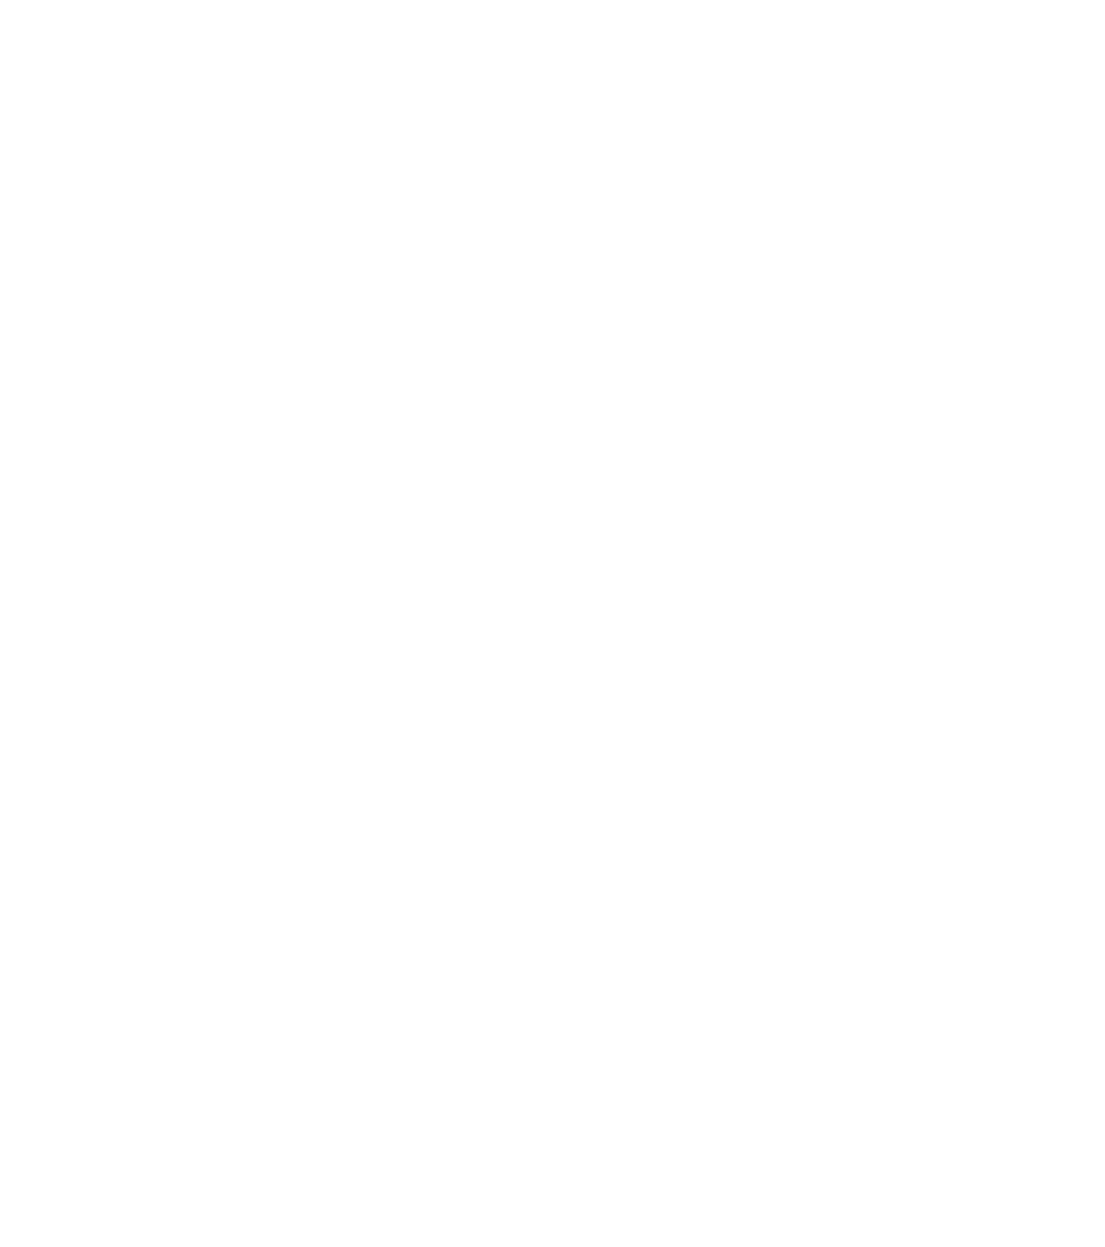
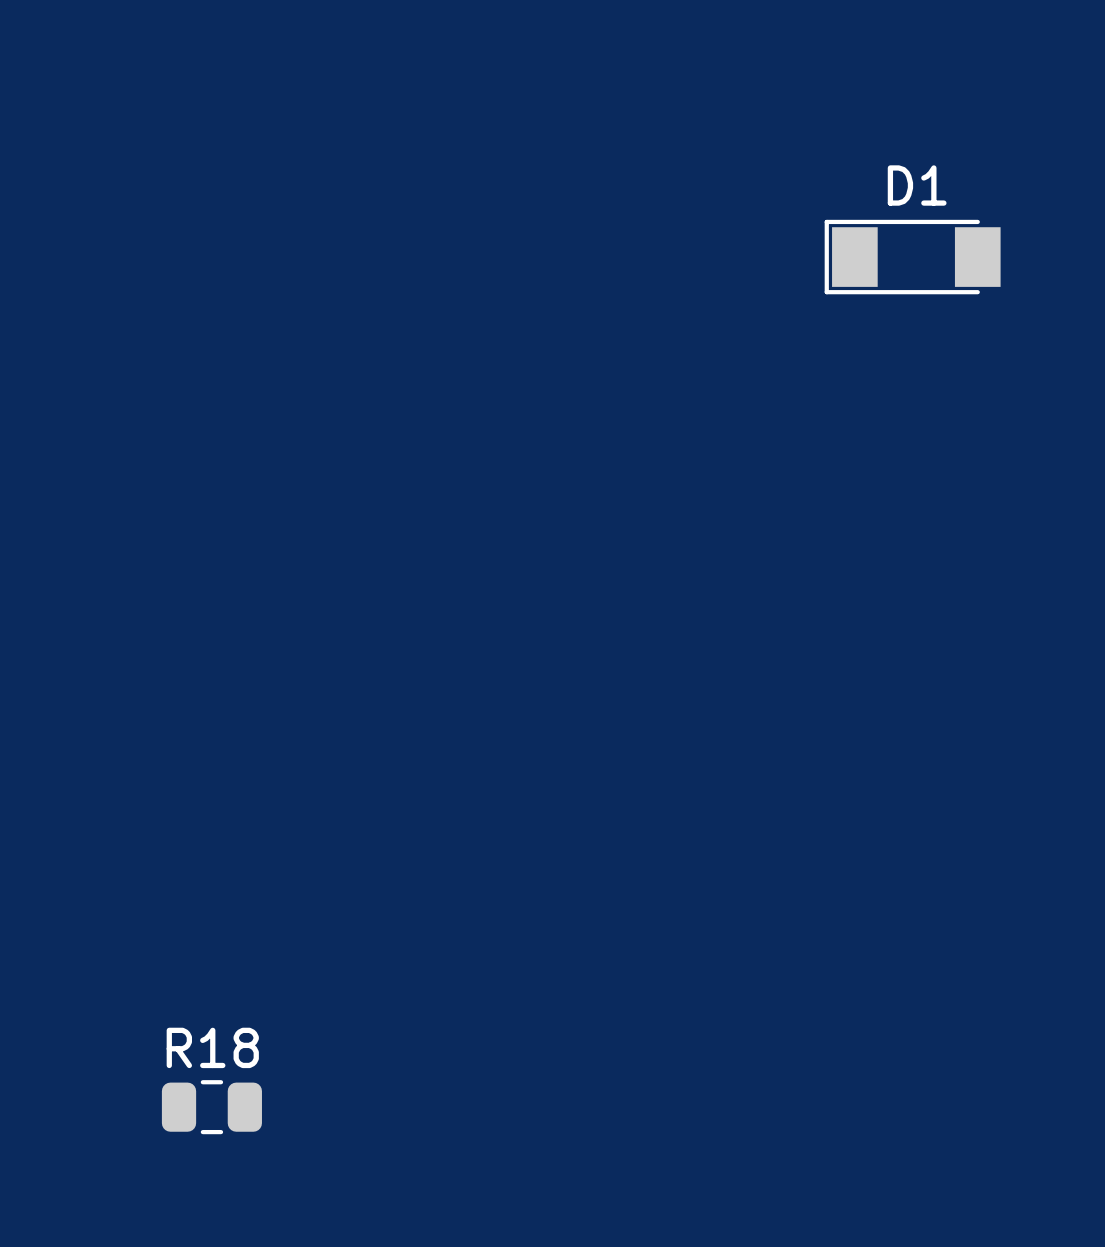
D1: none -> (912, 257)
R18: none -> (211, 1107)

